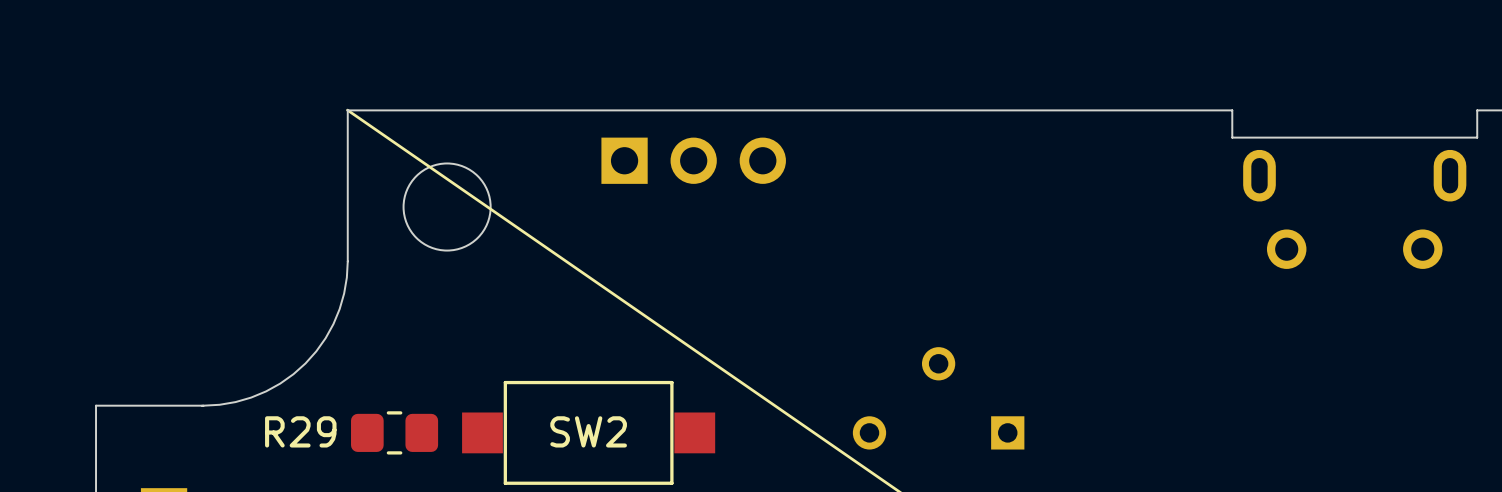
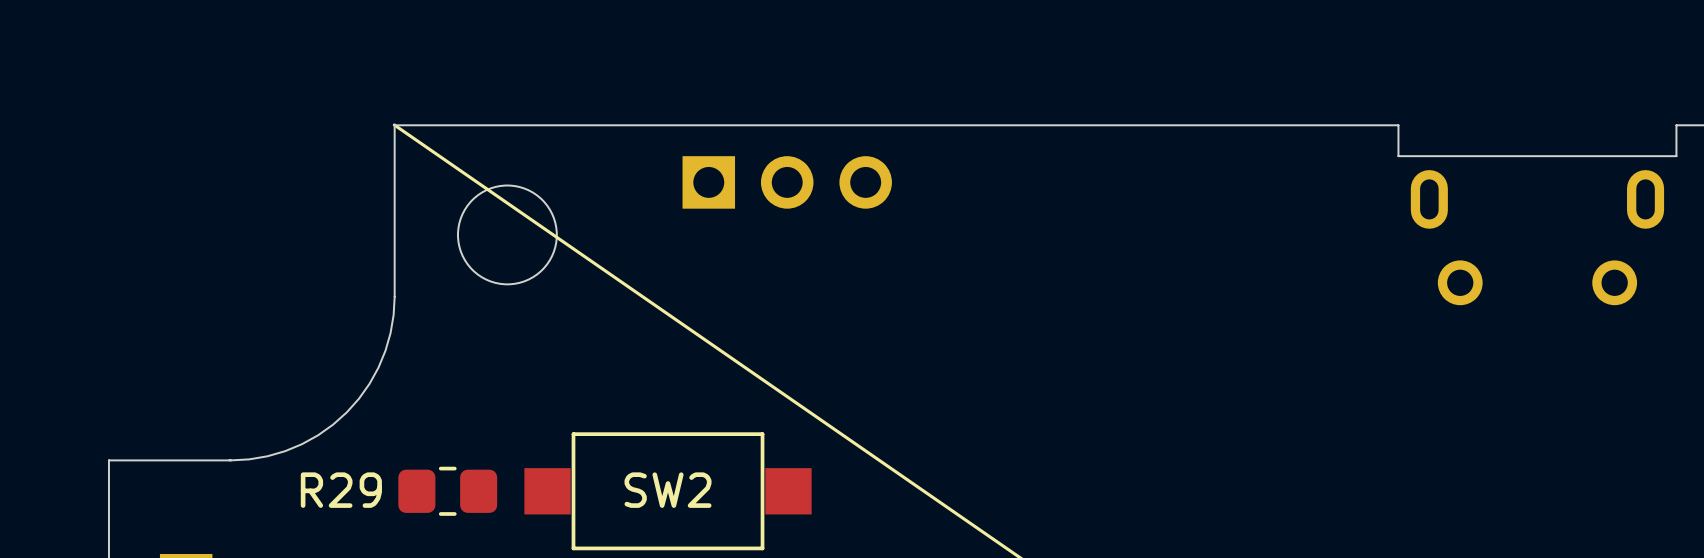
part: (938, 398) -> none

